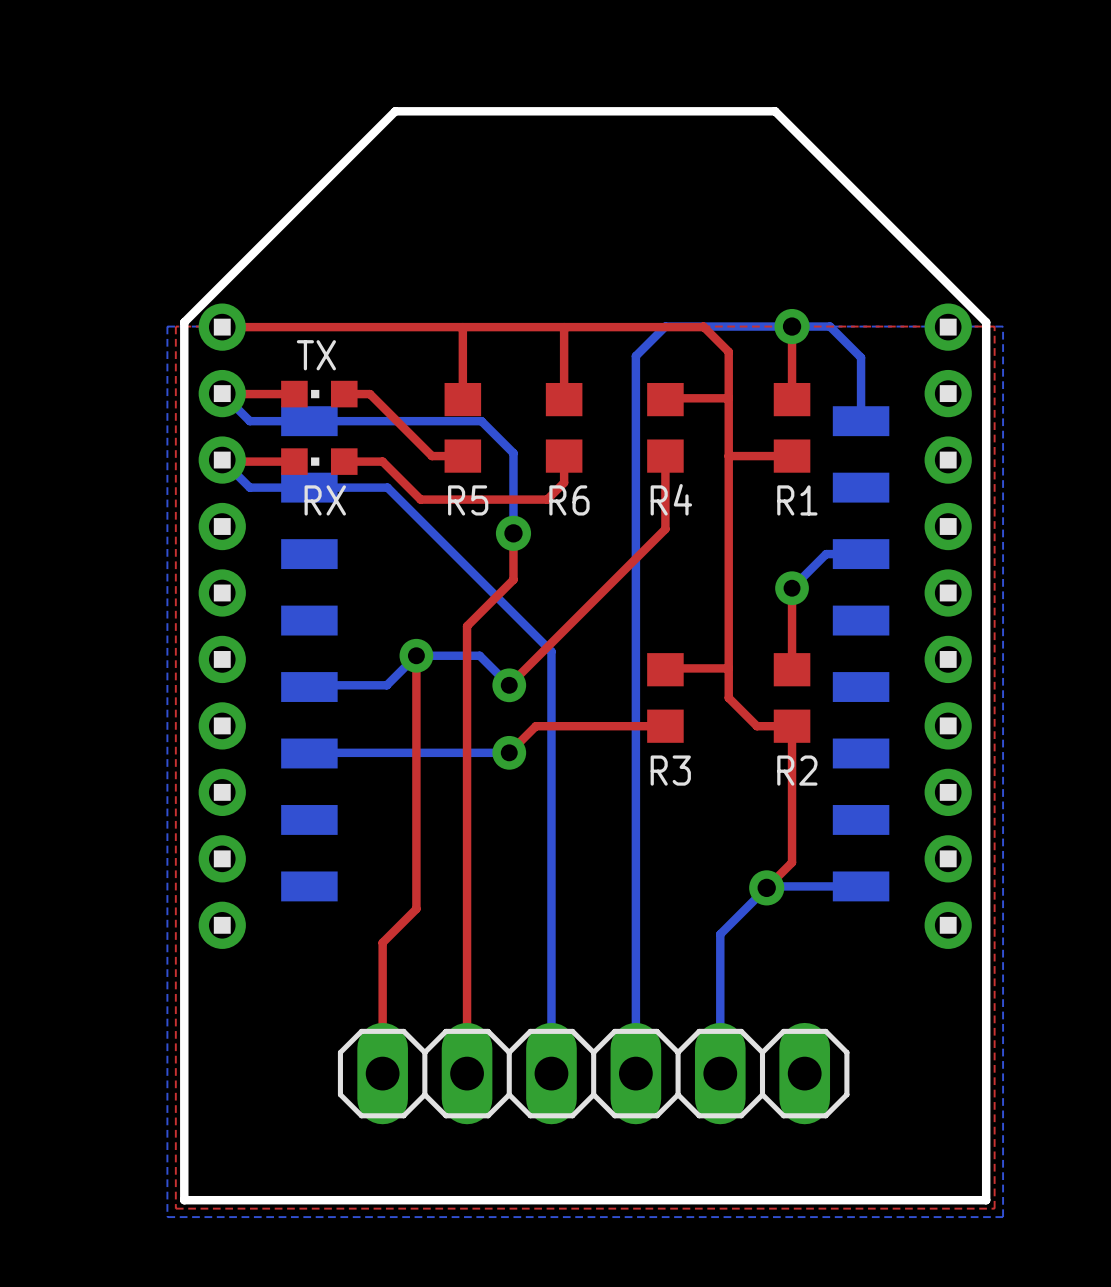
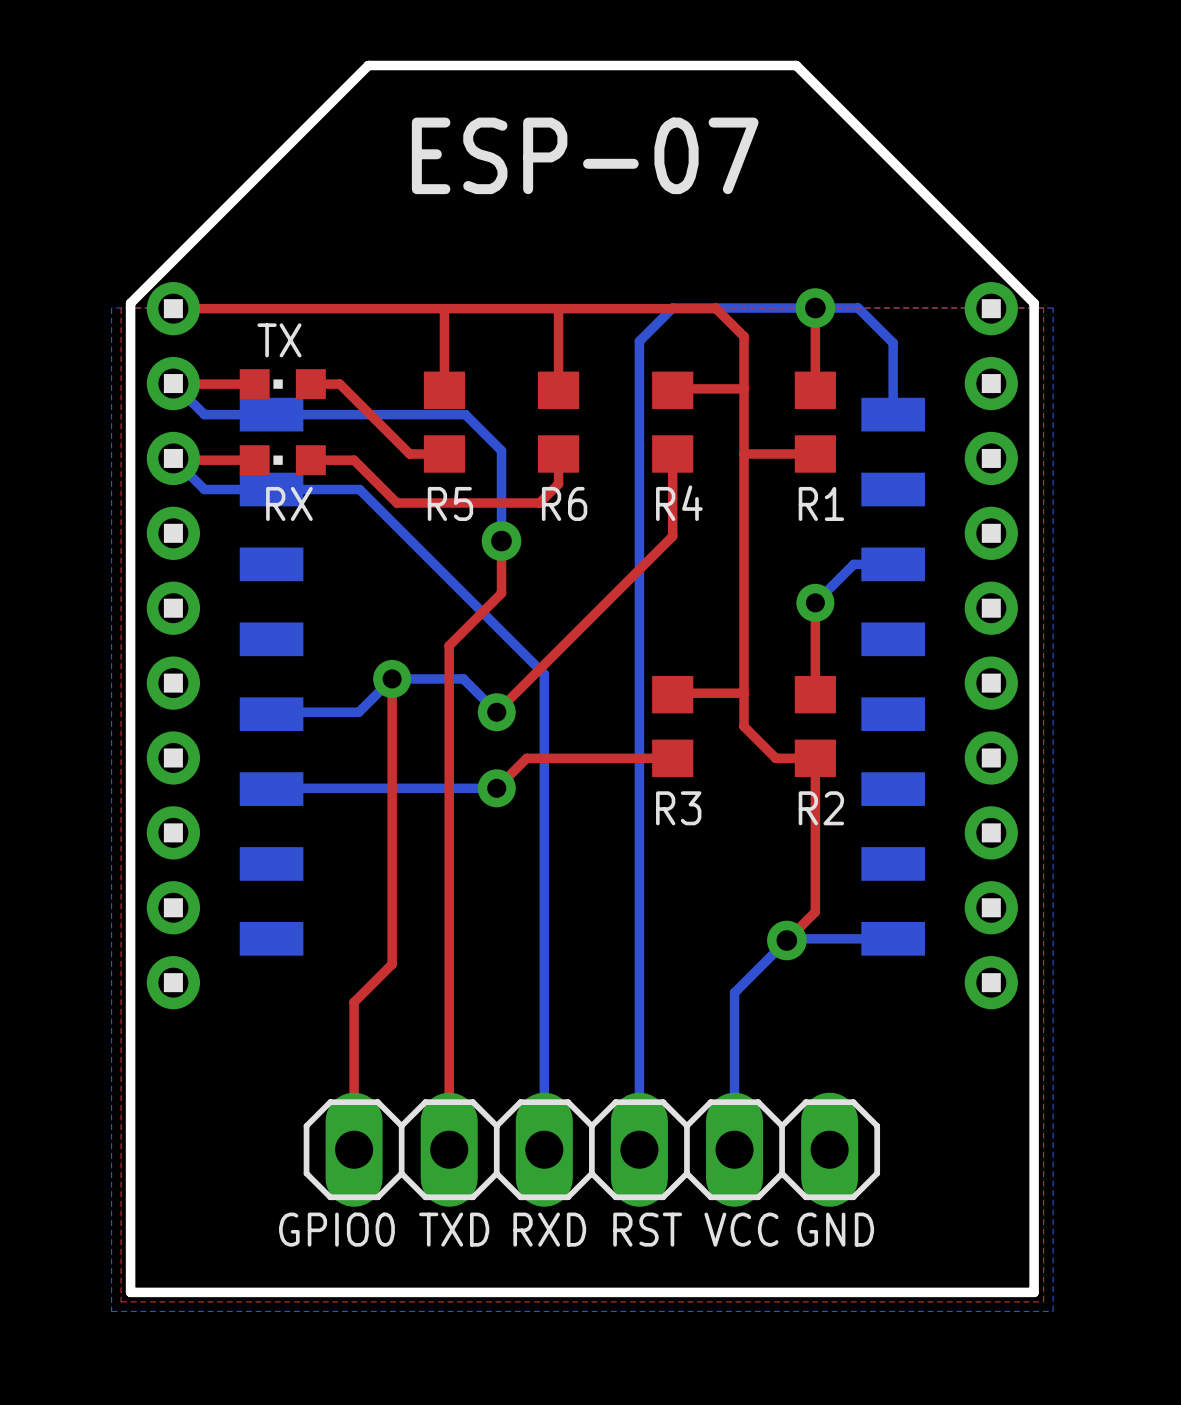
text: none -> ESP-07 (585, 155)
text: none -> GPIO0 (336, 1229)
text: none -> TXD (454, 1229)
text: none -> RXD (549, 1229)
text: none -> RST (647, 1229)
text: none -> VCC (741, 1229)
text: none -> GND (835, 1229)

